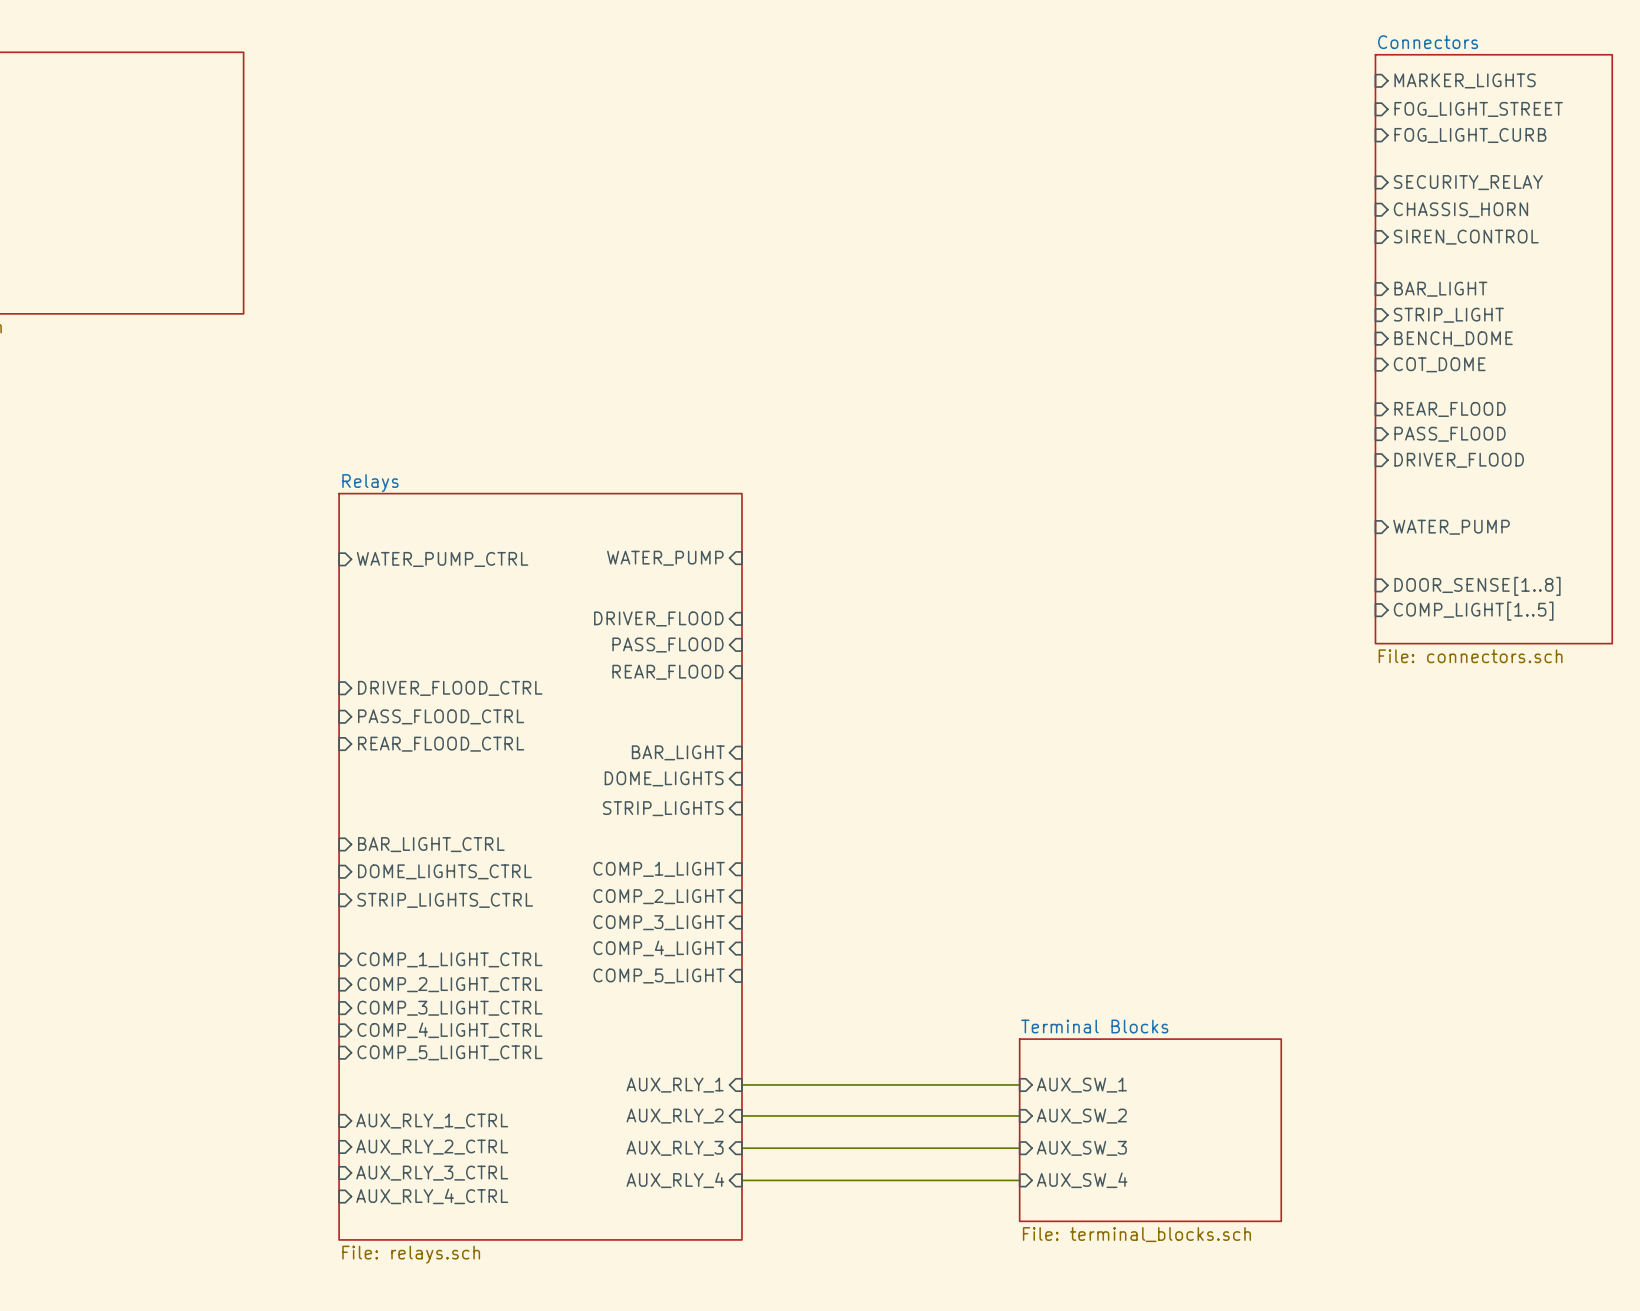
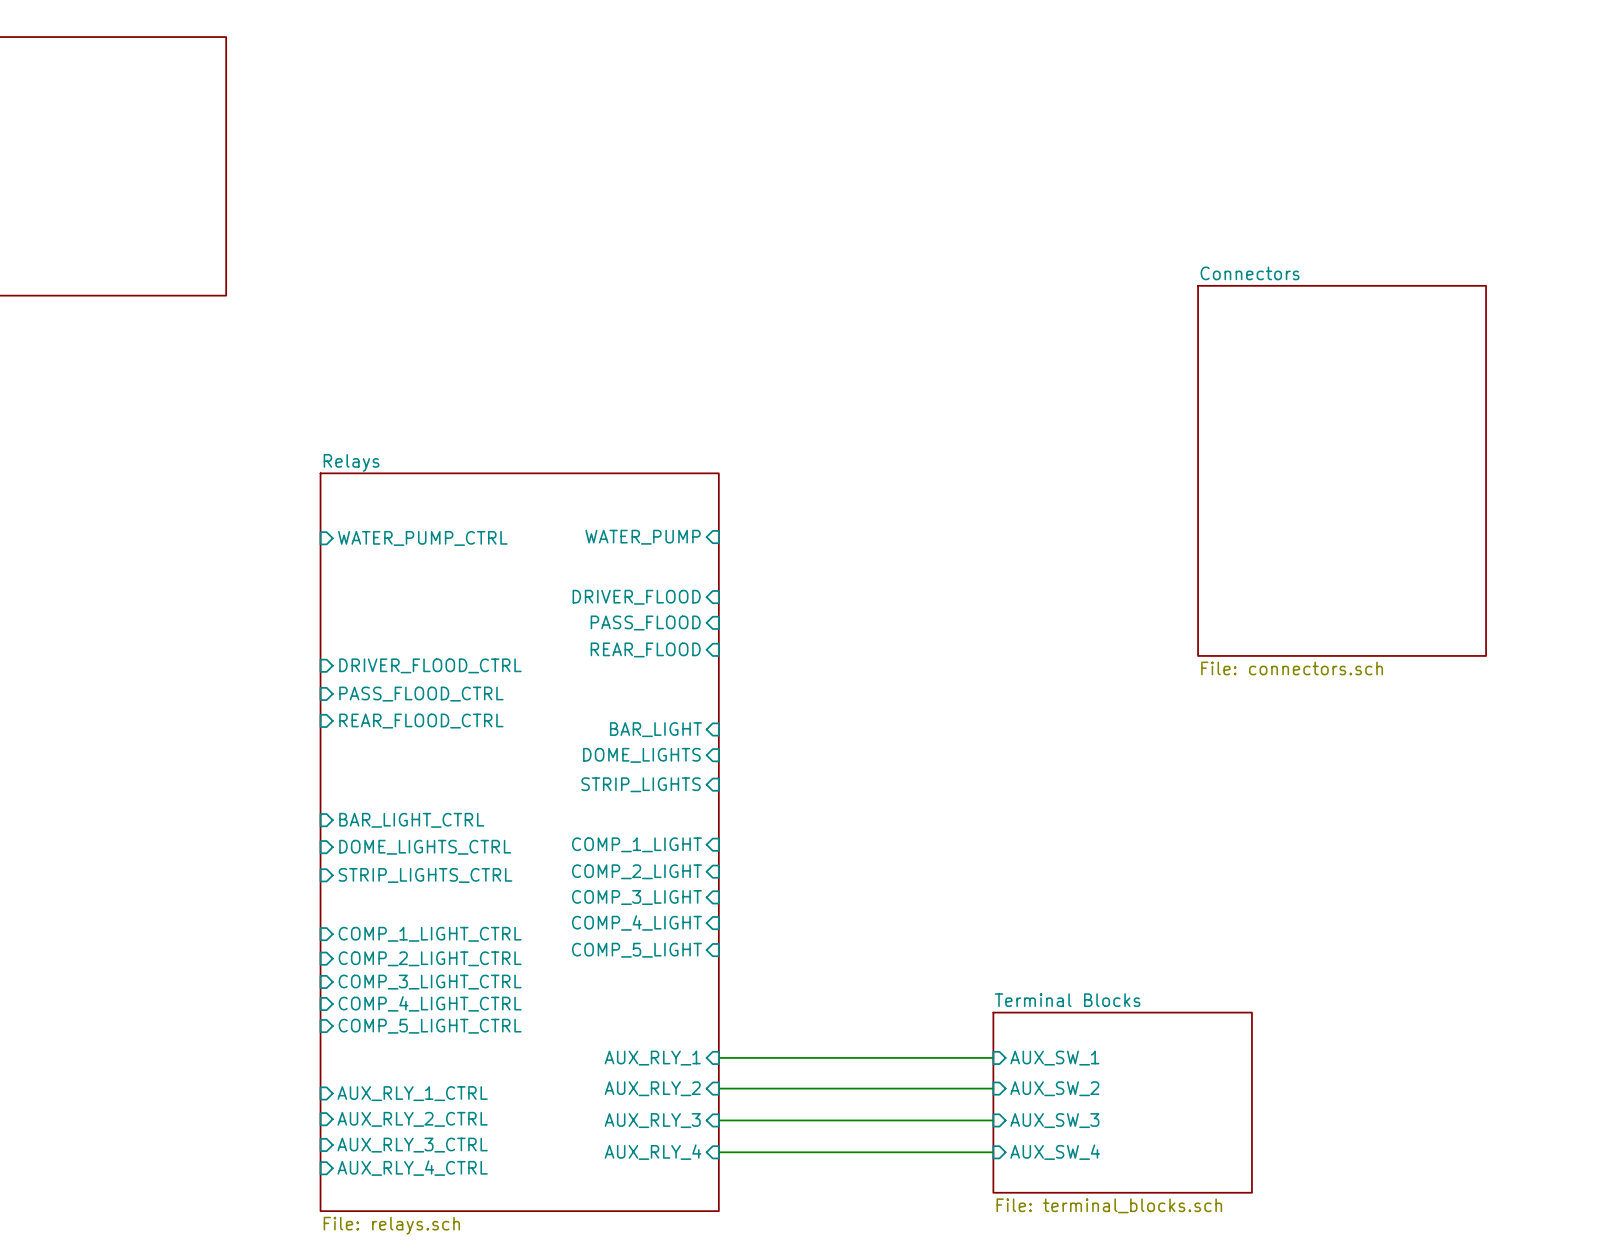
sheet pin: MARKER_LIGHTS (1465, 80) -> none
sheet pin: FOG_LIGHT_STREET (1478, 109) -> none
sheet pin: FOG_LIGHT_CURB (1470, 135) -> none
sheet pin: SECURITY_RELAY (1468, 182) -> none
sheet pin: CHASSIS_HORN (1460, 209) -> none
sheet pin: SIREN_CONTROL (1466, 237) -> none
sheet pin: BAR_LIGHT (1440, 289) -> none
sheet pin: STRIP_LIGHT (1448, 315) -> none
sheet pin: BENCH_DOME (1453, 338) -> none
sheet Connectors: File: connectors.sch (1493, 349) -> none
sheet pin: COT_DOME (1439, 364) -> none
sheet pin: REAR_FLOOD (1450, 409) -> none
sheet pin: PASS_FLOOD (1450, 434) -> none
sheet pin: DRIVER_FLOOD (1459, 460) -> none
sheet Connectors: none -> File: connectors.sch (1342, 470)
sheet pin: WATER_PUMP (1451, 527) -> none
sheet pin: DOOR_SENSE[1..8] (1477, 586) -> none
sheet pin: COMP_LIGHT[1..5] (1473, 611) -> none

